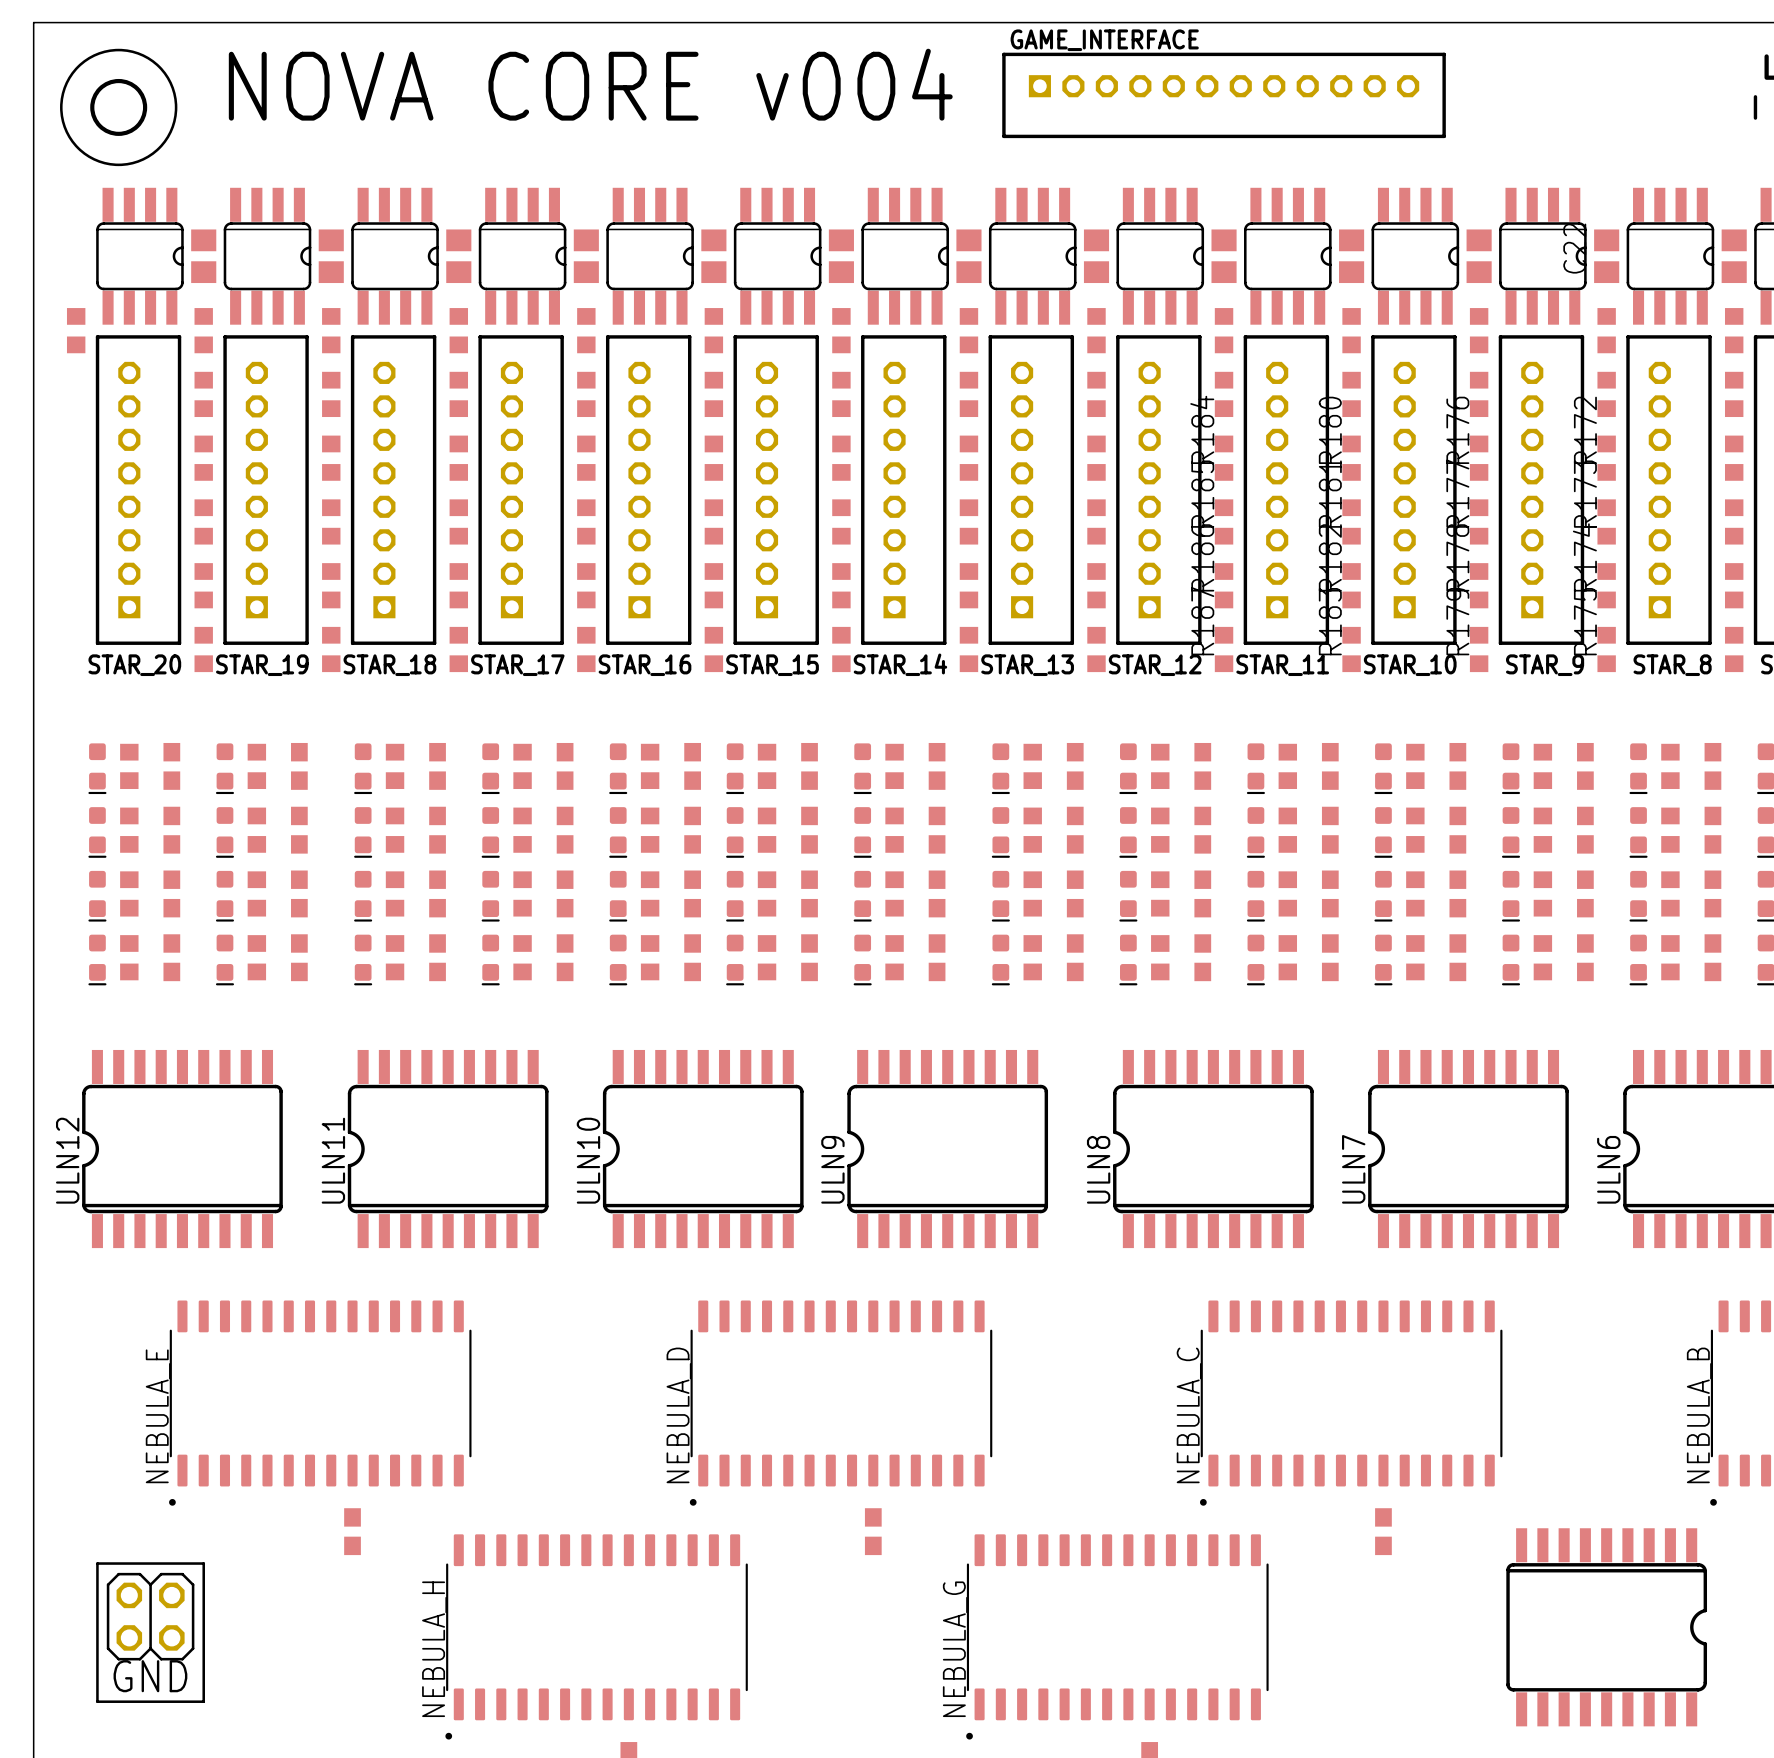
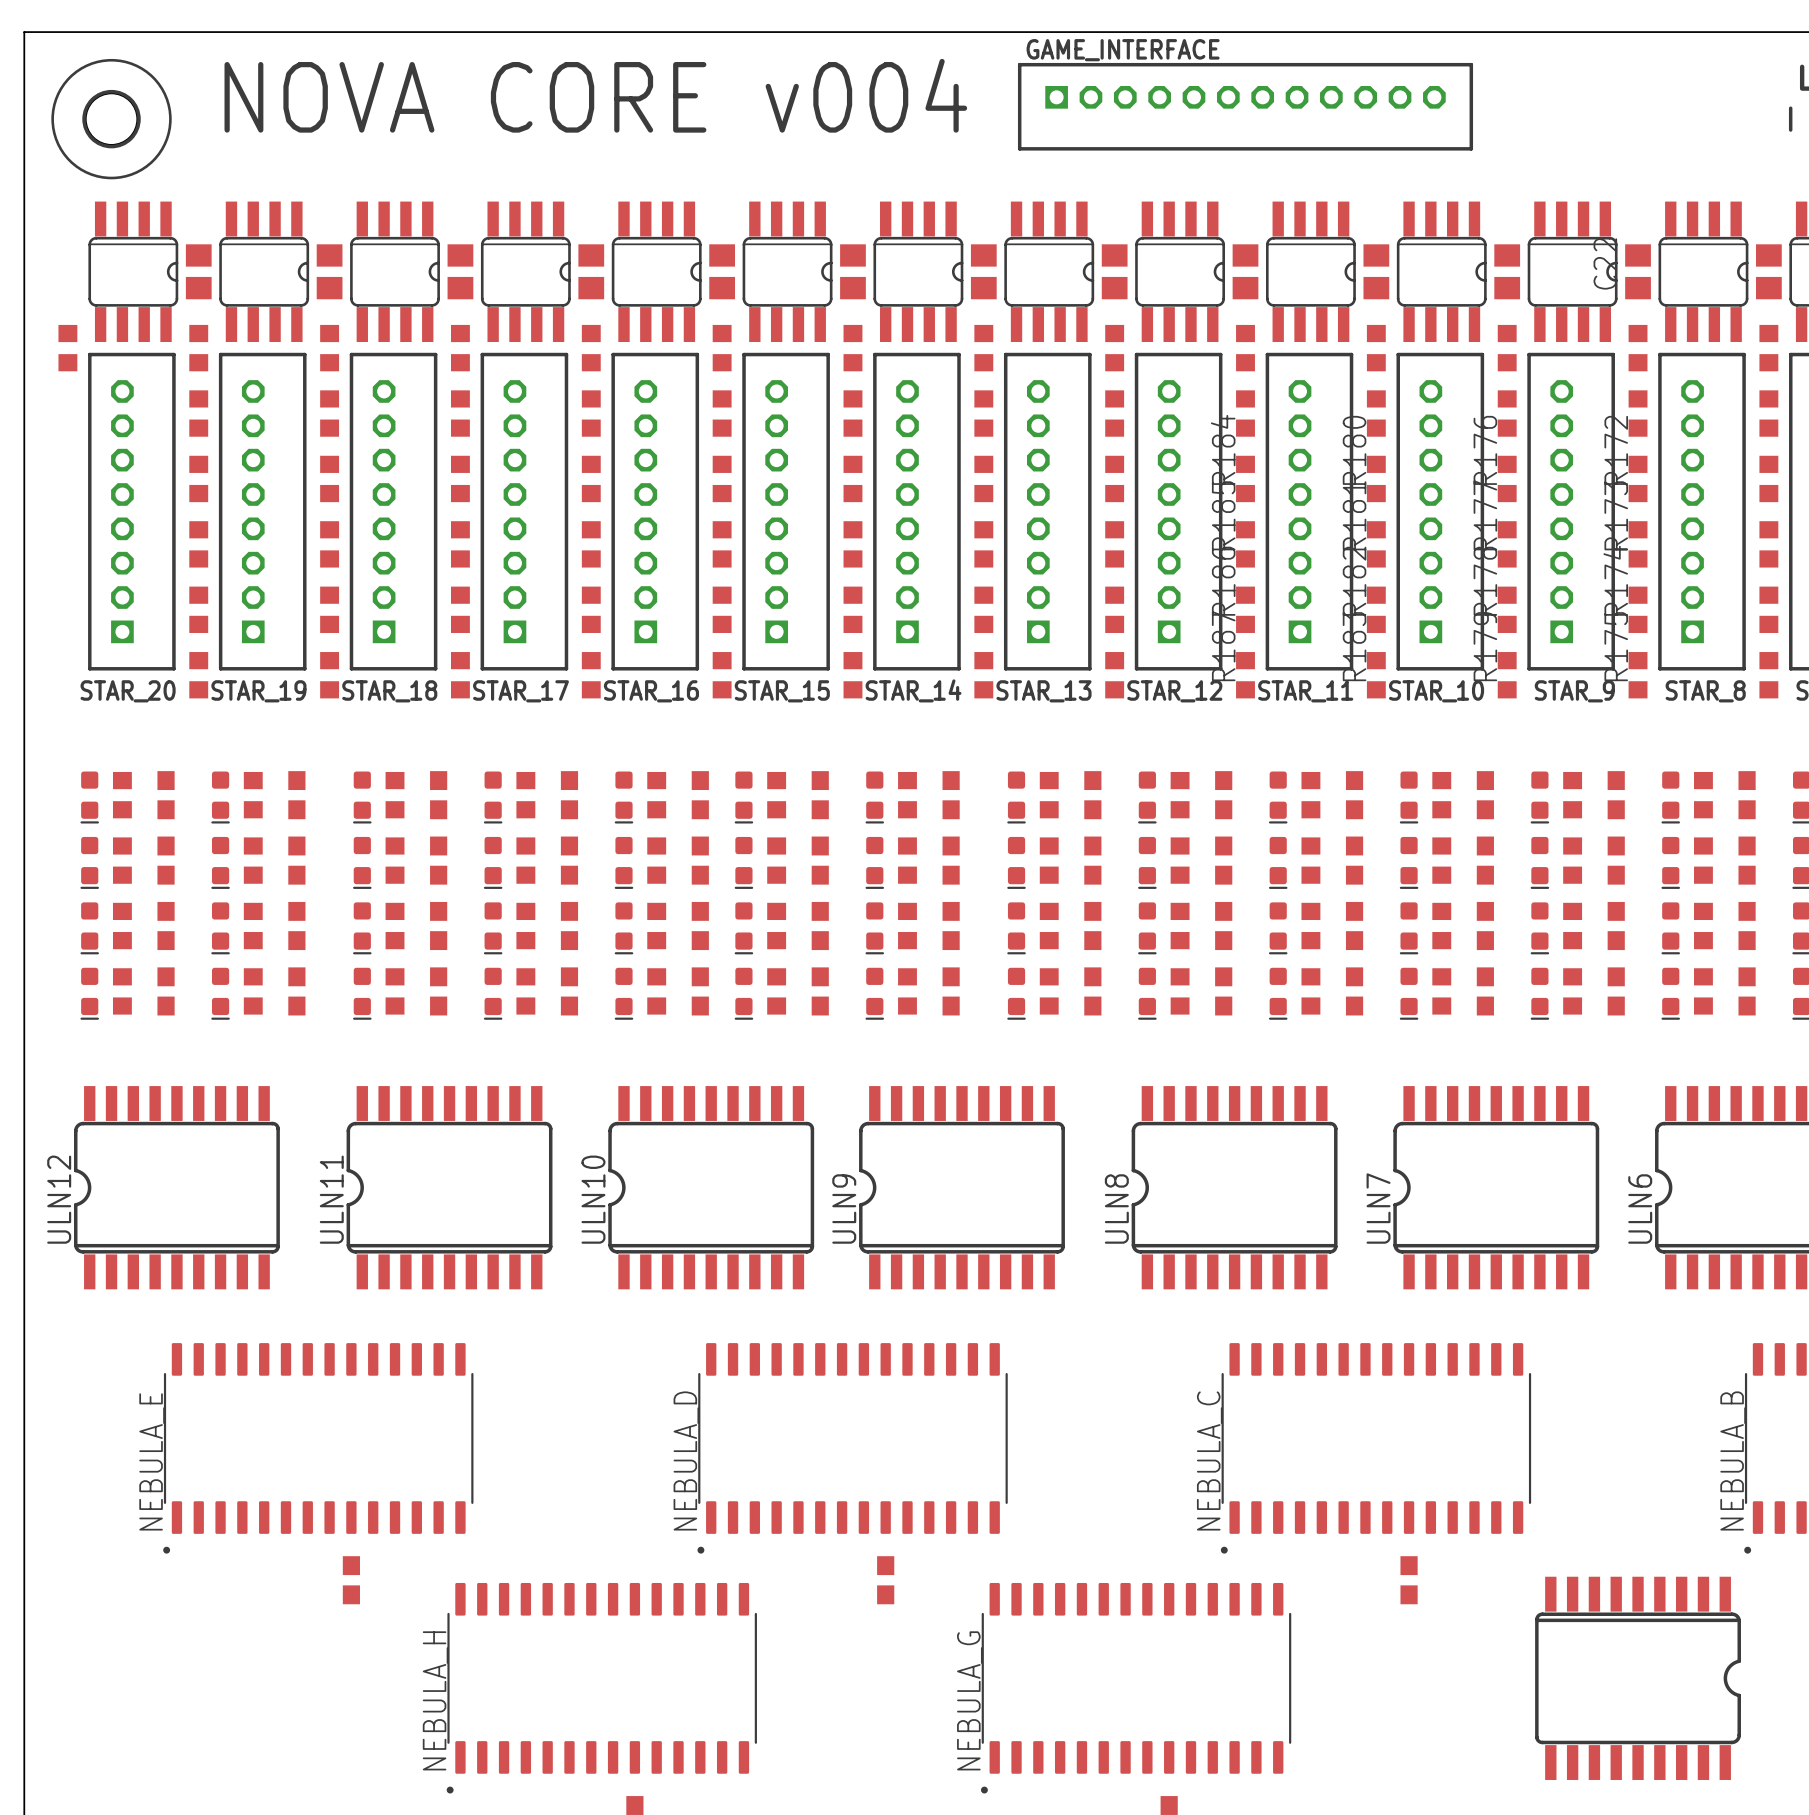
line: (97, 1563) (97, 1701) (203, 1701) (203, 1563) (97, 1563) -> none
part: (150, 1616) -> none
text: GND (150, 1676) -> none

